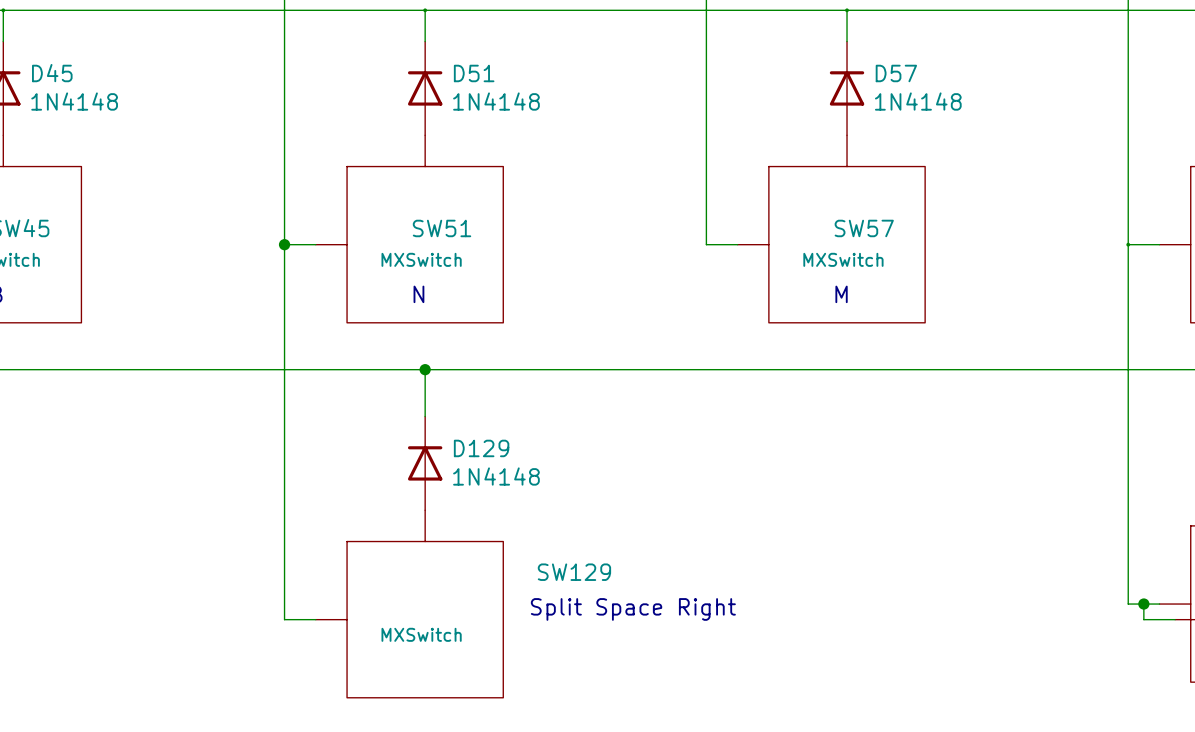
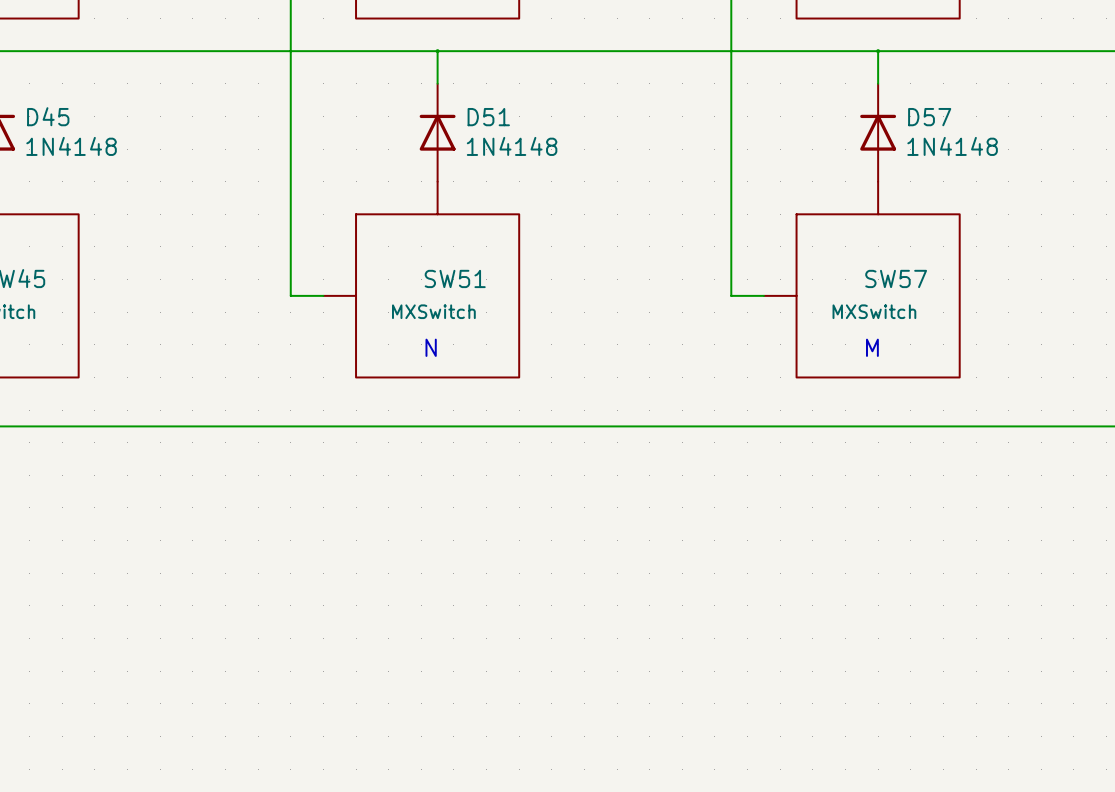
wire: (284, 244) (284, 619) (315, 619) -> none
junction: (284, 244) -> none
wire: (425, 369) (425, 416) -> none
junction: (425, 369) -> none
D129: 1N4148 (425, 463) -> none
SW129: MXSwitch (409, 604) -> none
text: Split Space Right (633, 609) -> none

